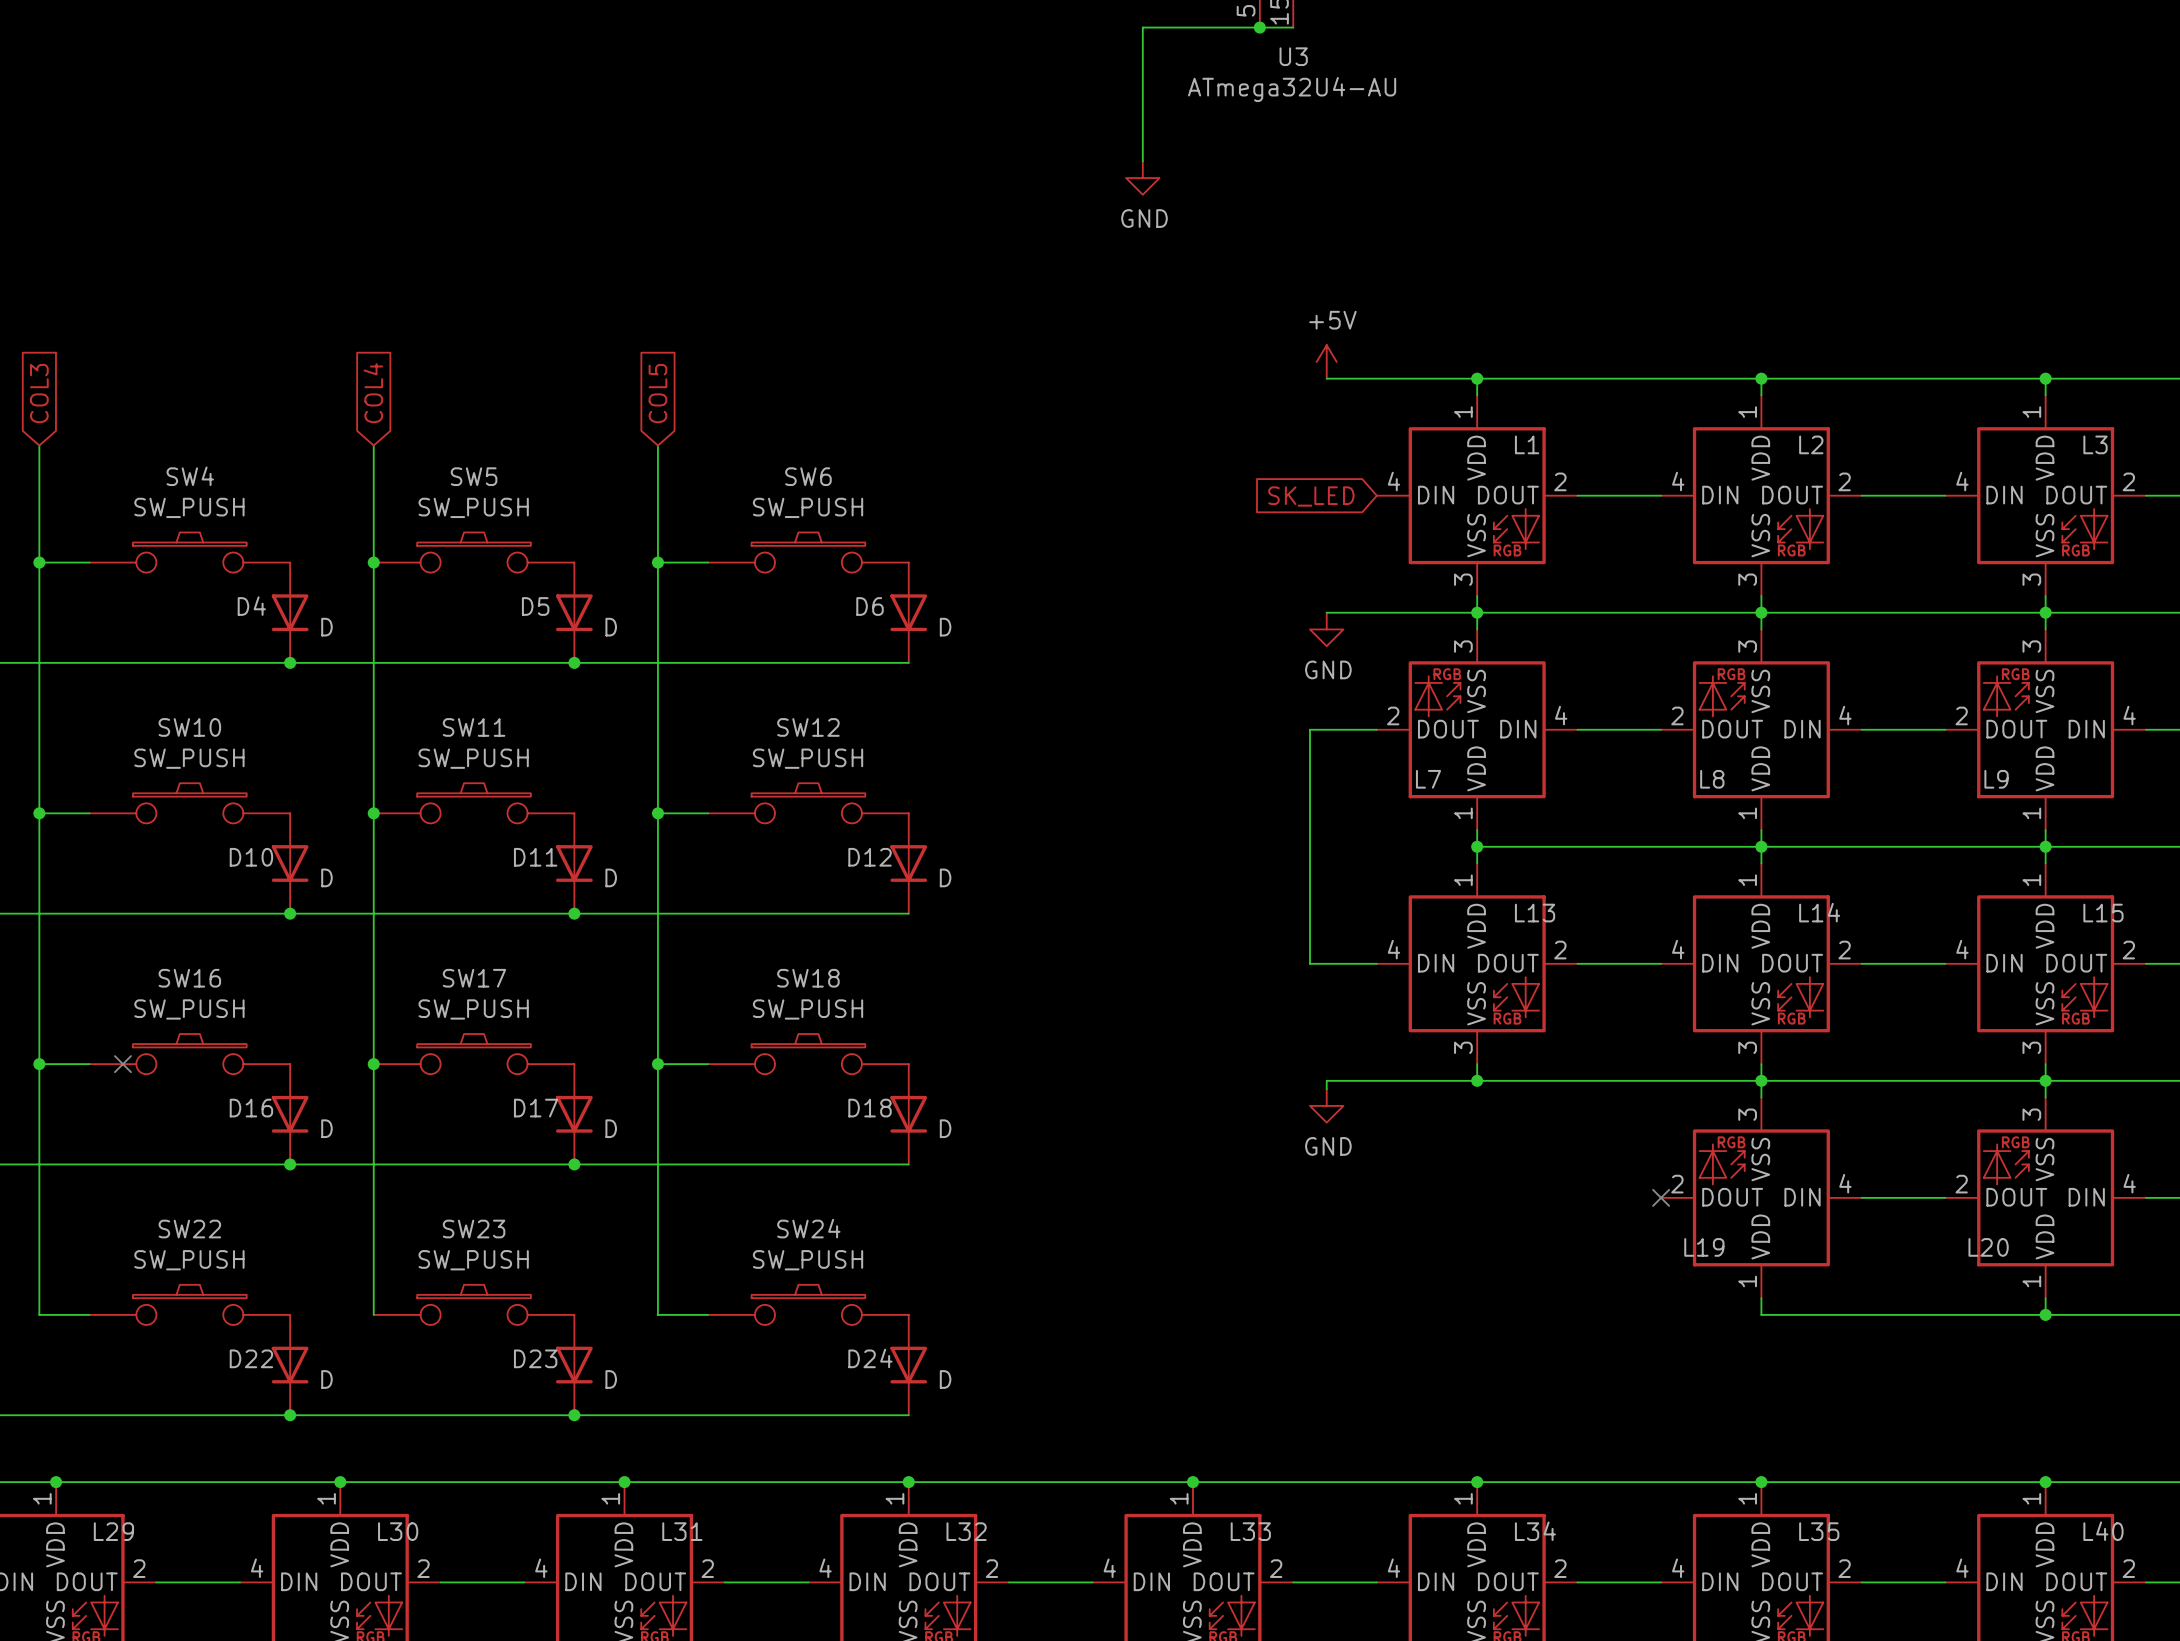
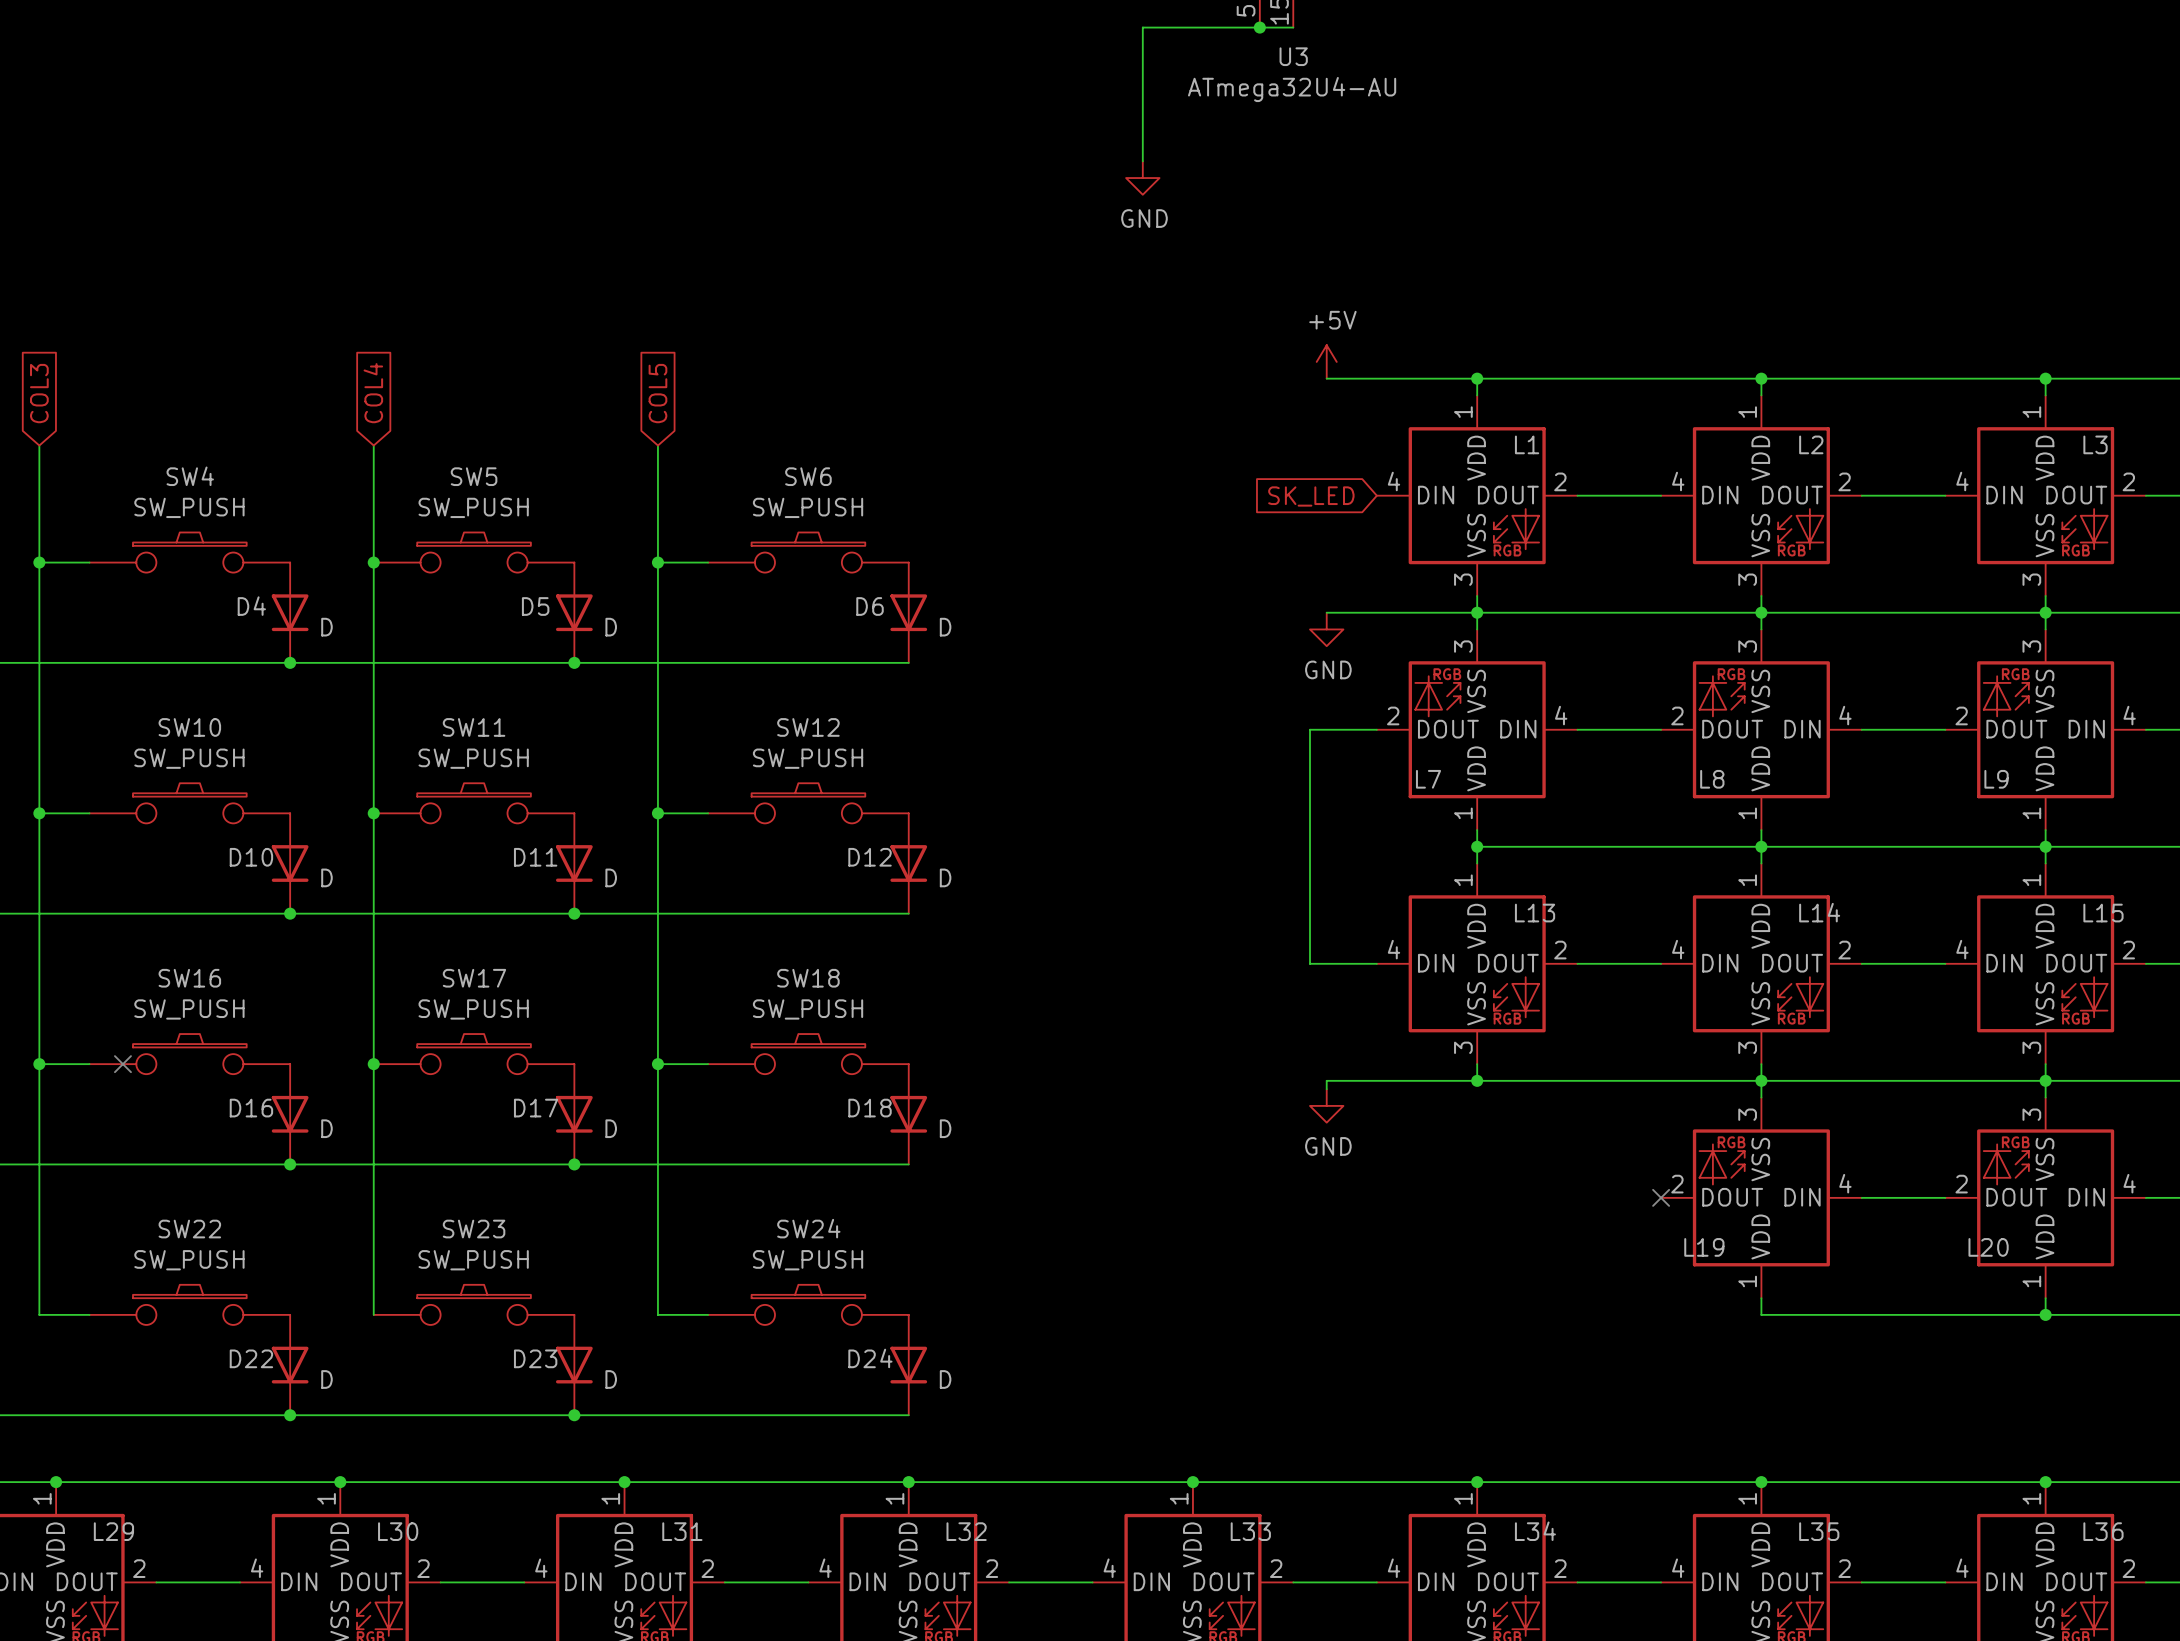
L40 name: L40 (2103, 1531) -> L36 (2103, 1531)

